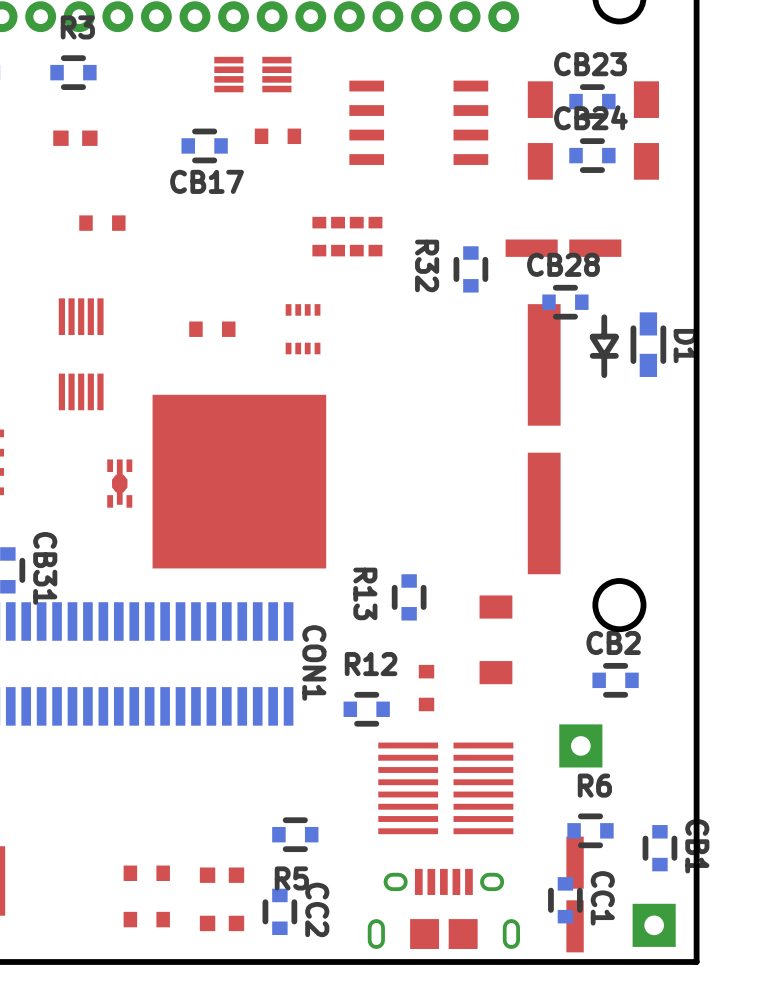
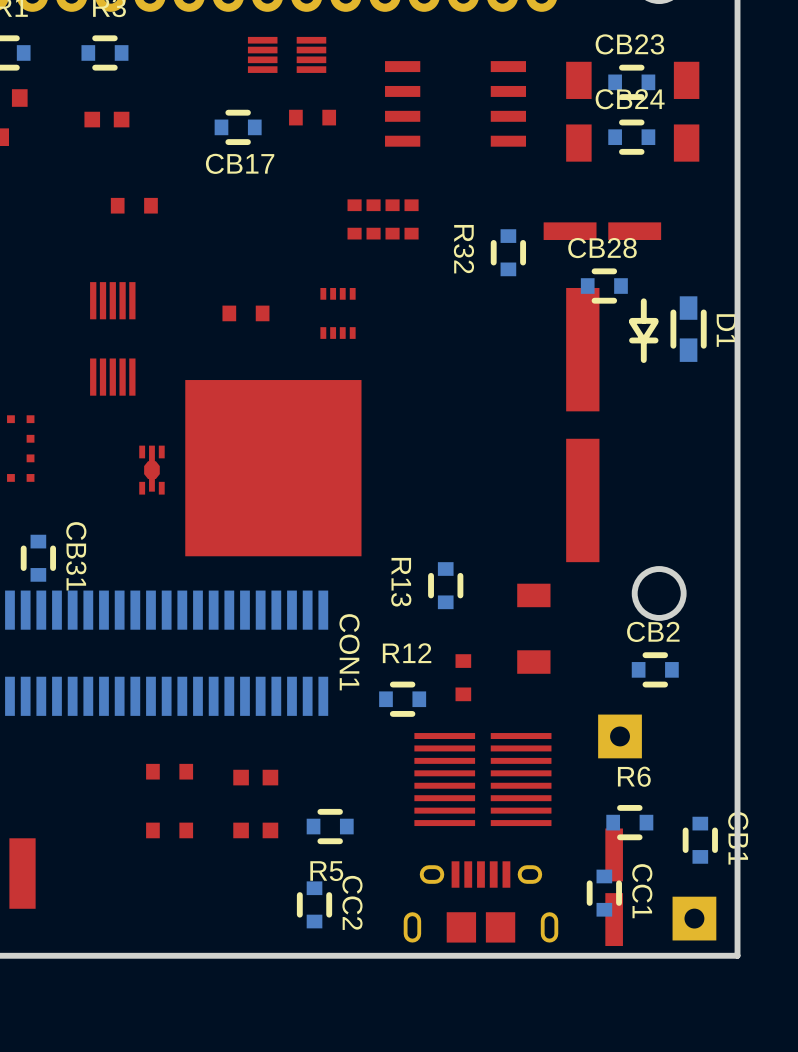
part: none -> (169, 771)
part: none -> (255, 777)
part position: (146, 873) -> (169, 830)
part position: (222, 875) -> (255, 830)
part: (146, 919) -> none
part: (222, 923) -> none

